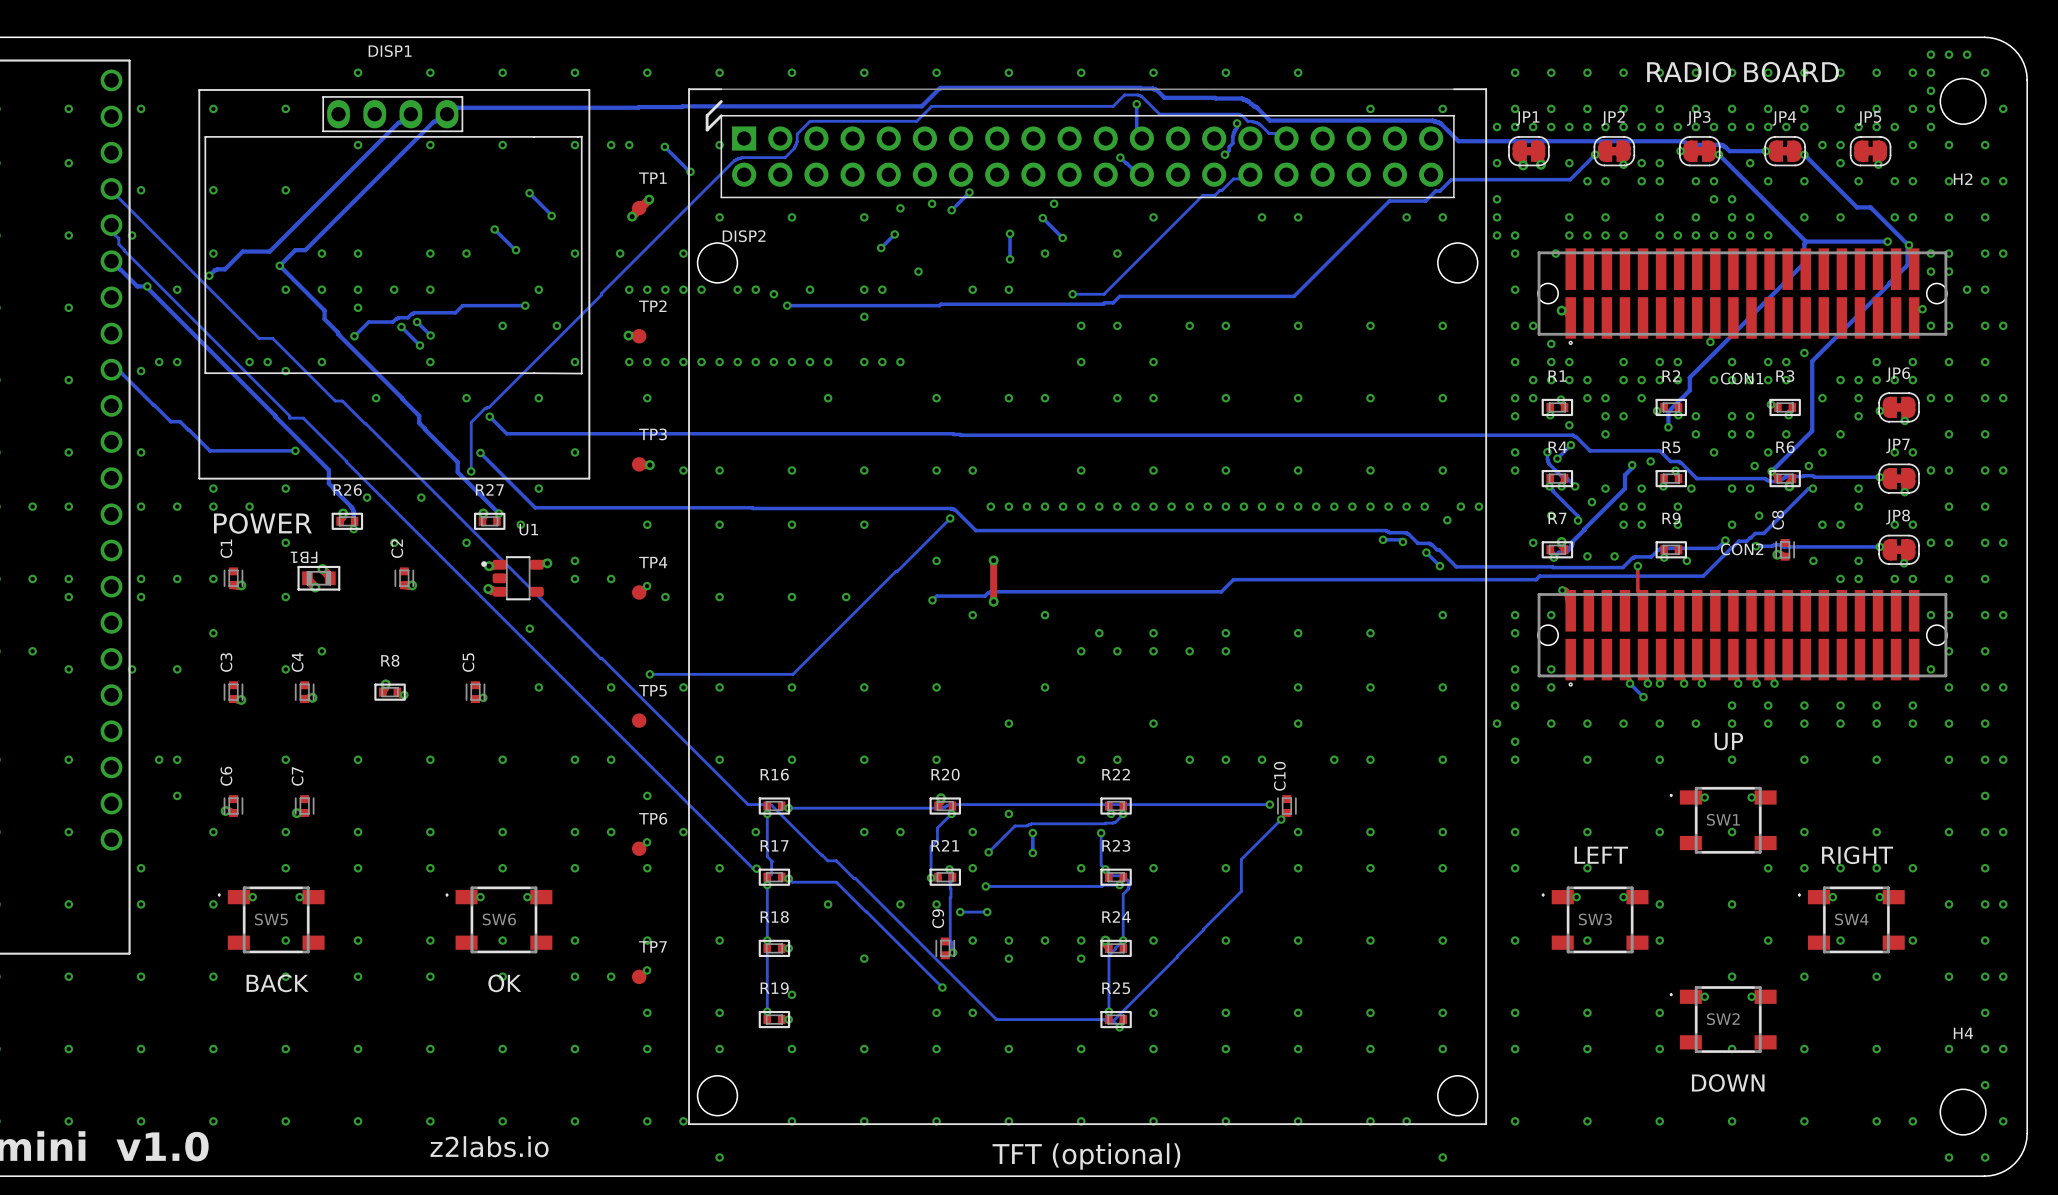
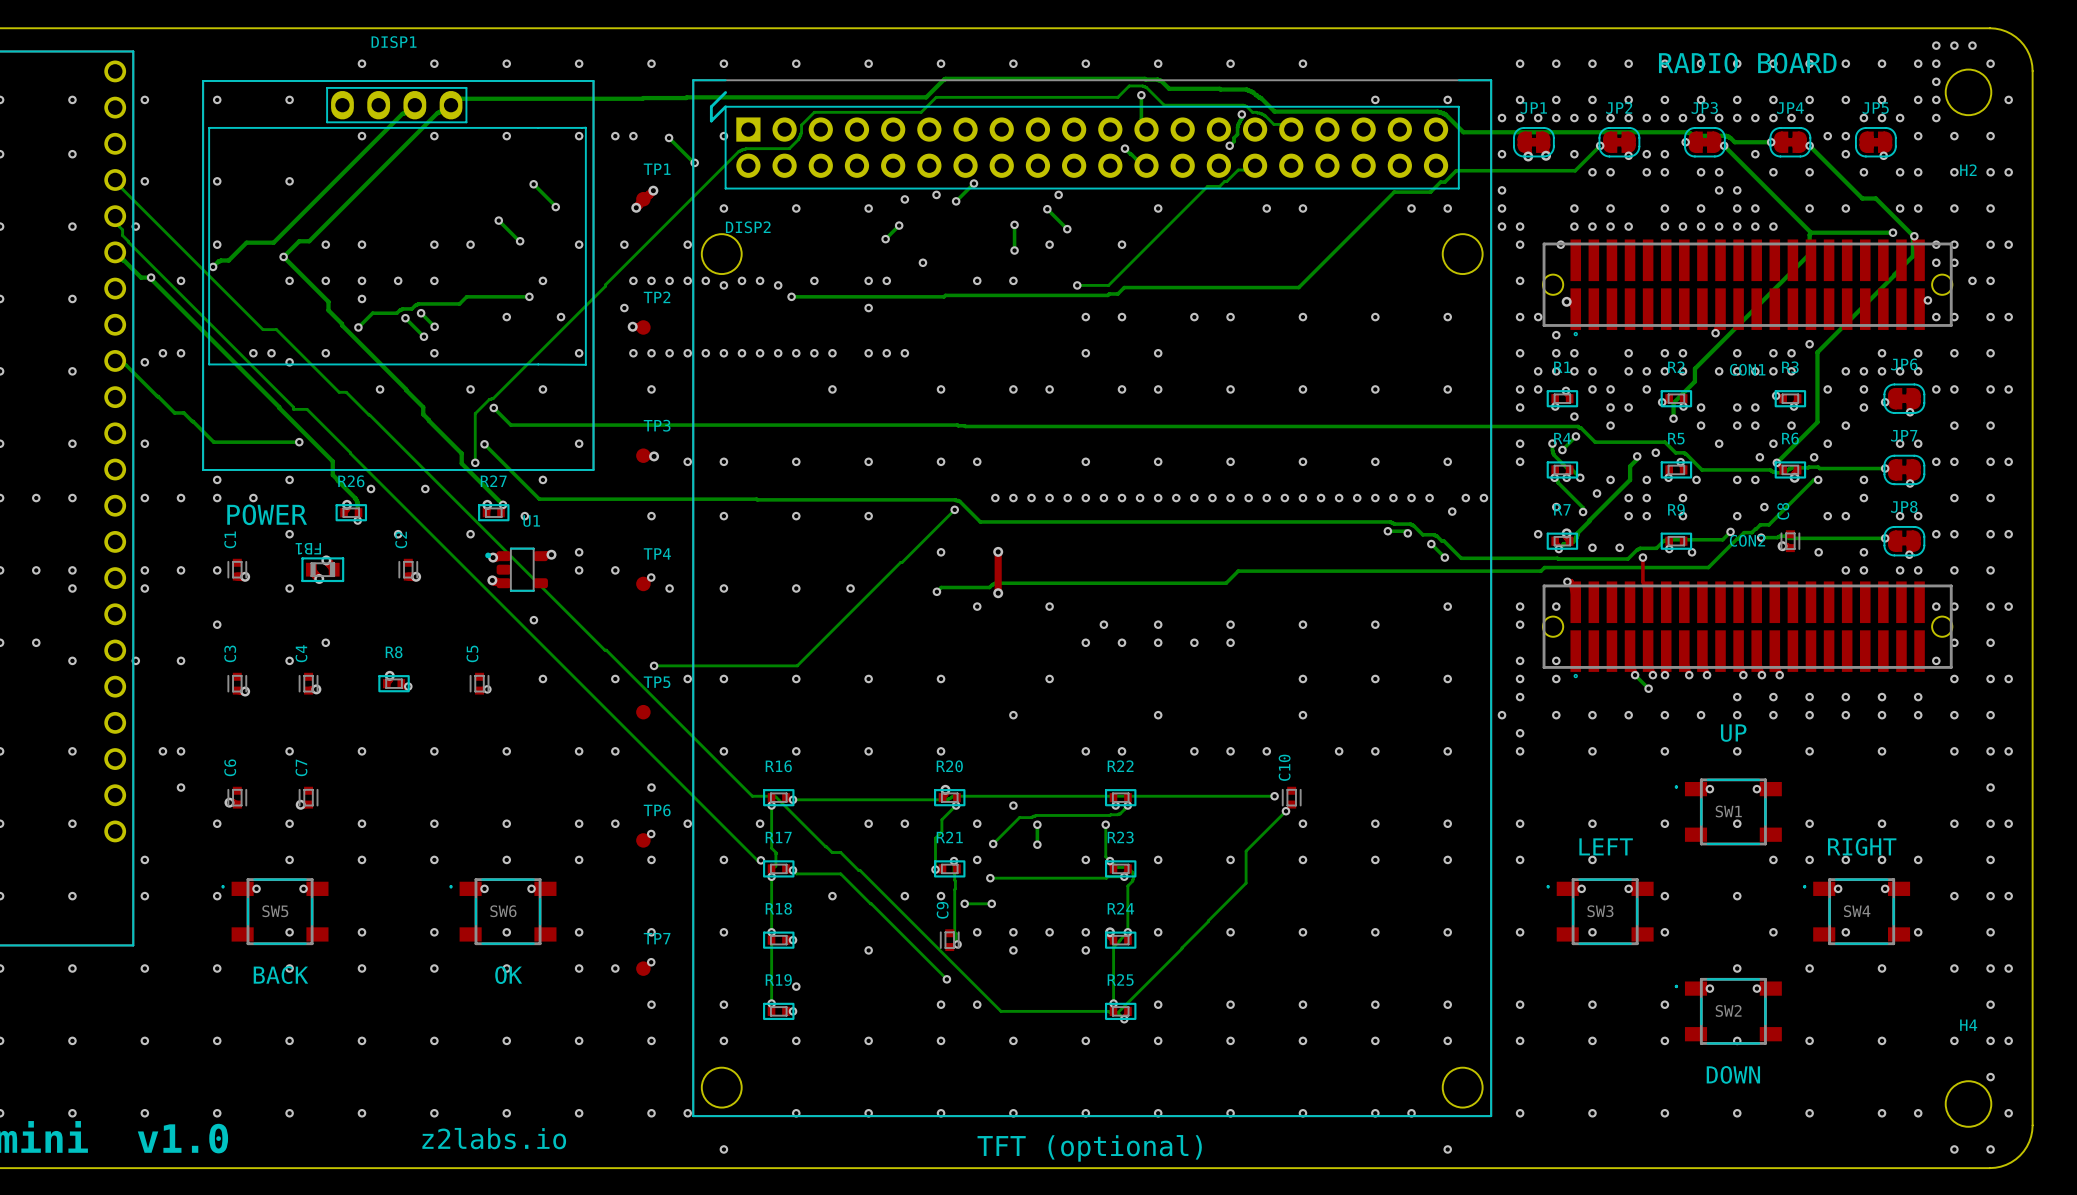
via: none -> (723, 285)
via: none -> (624, 308)

